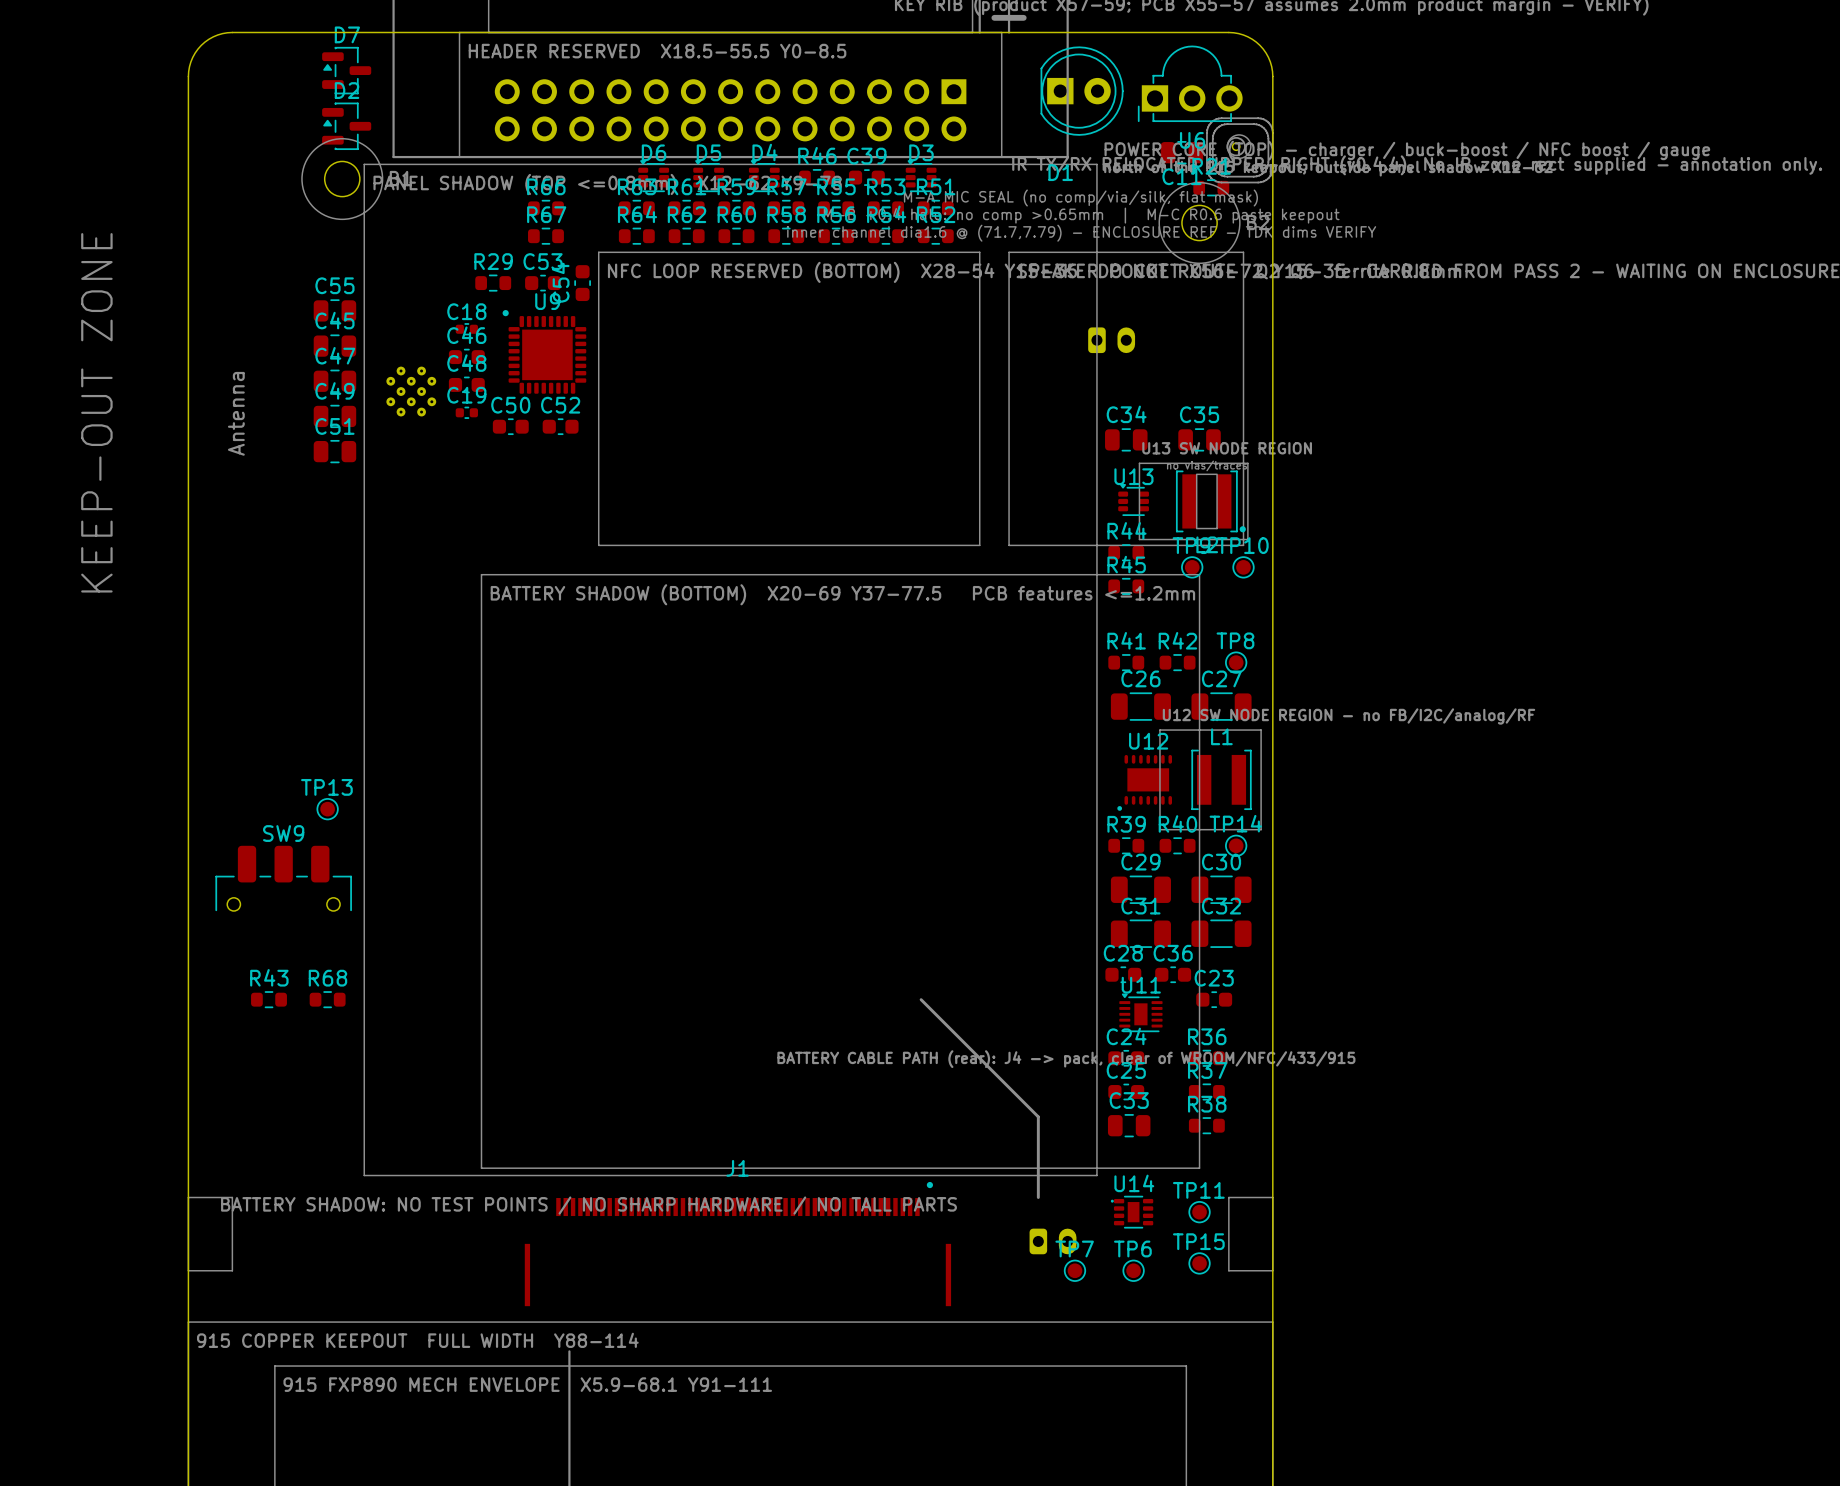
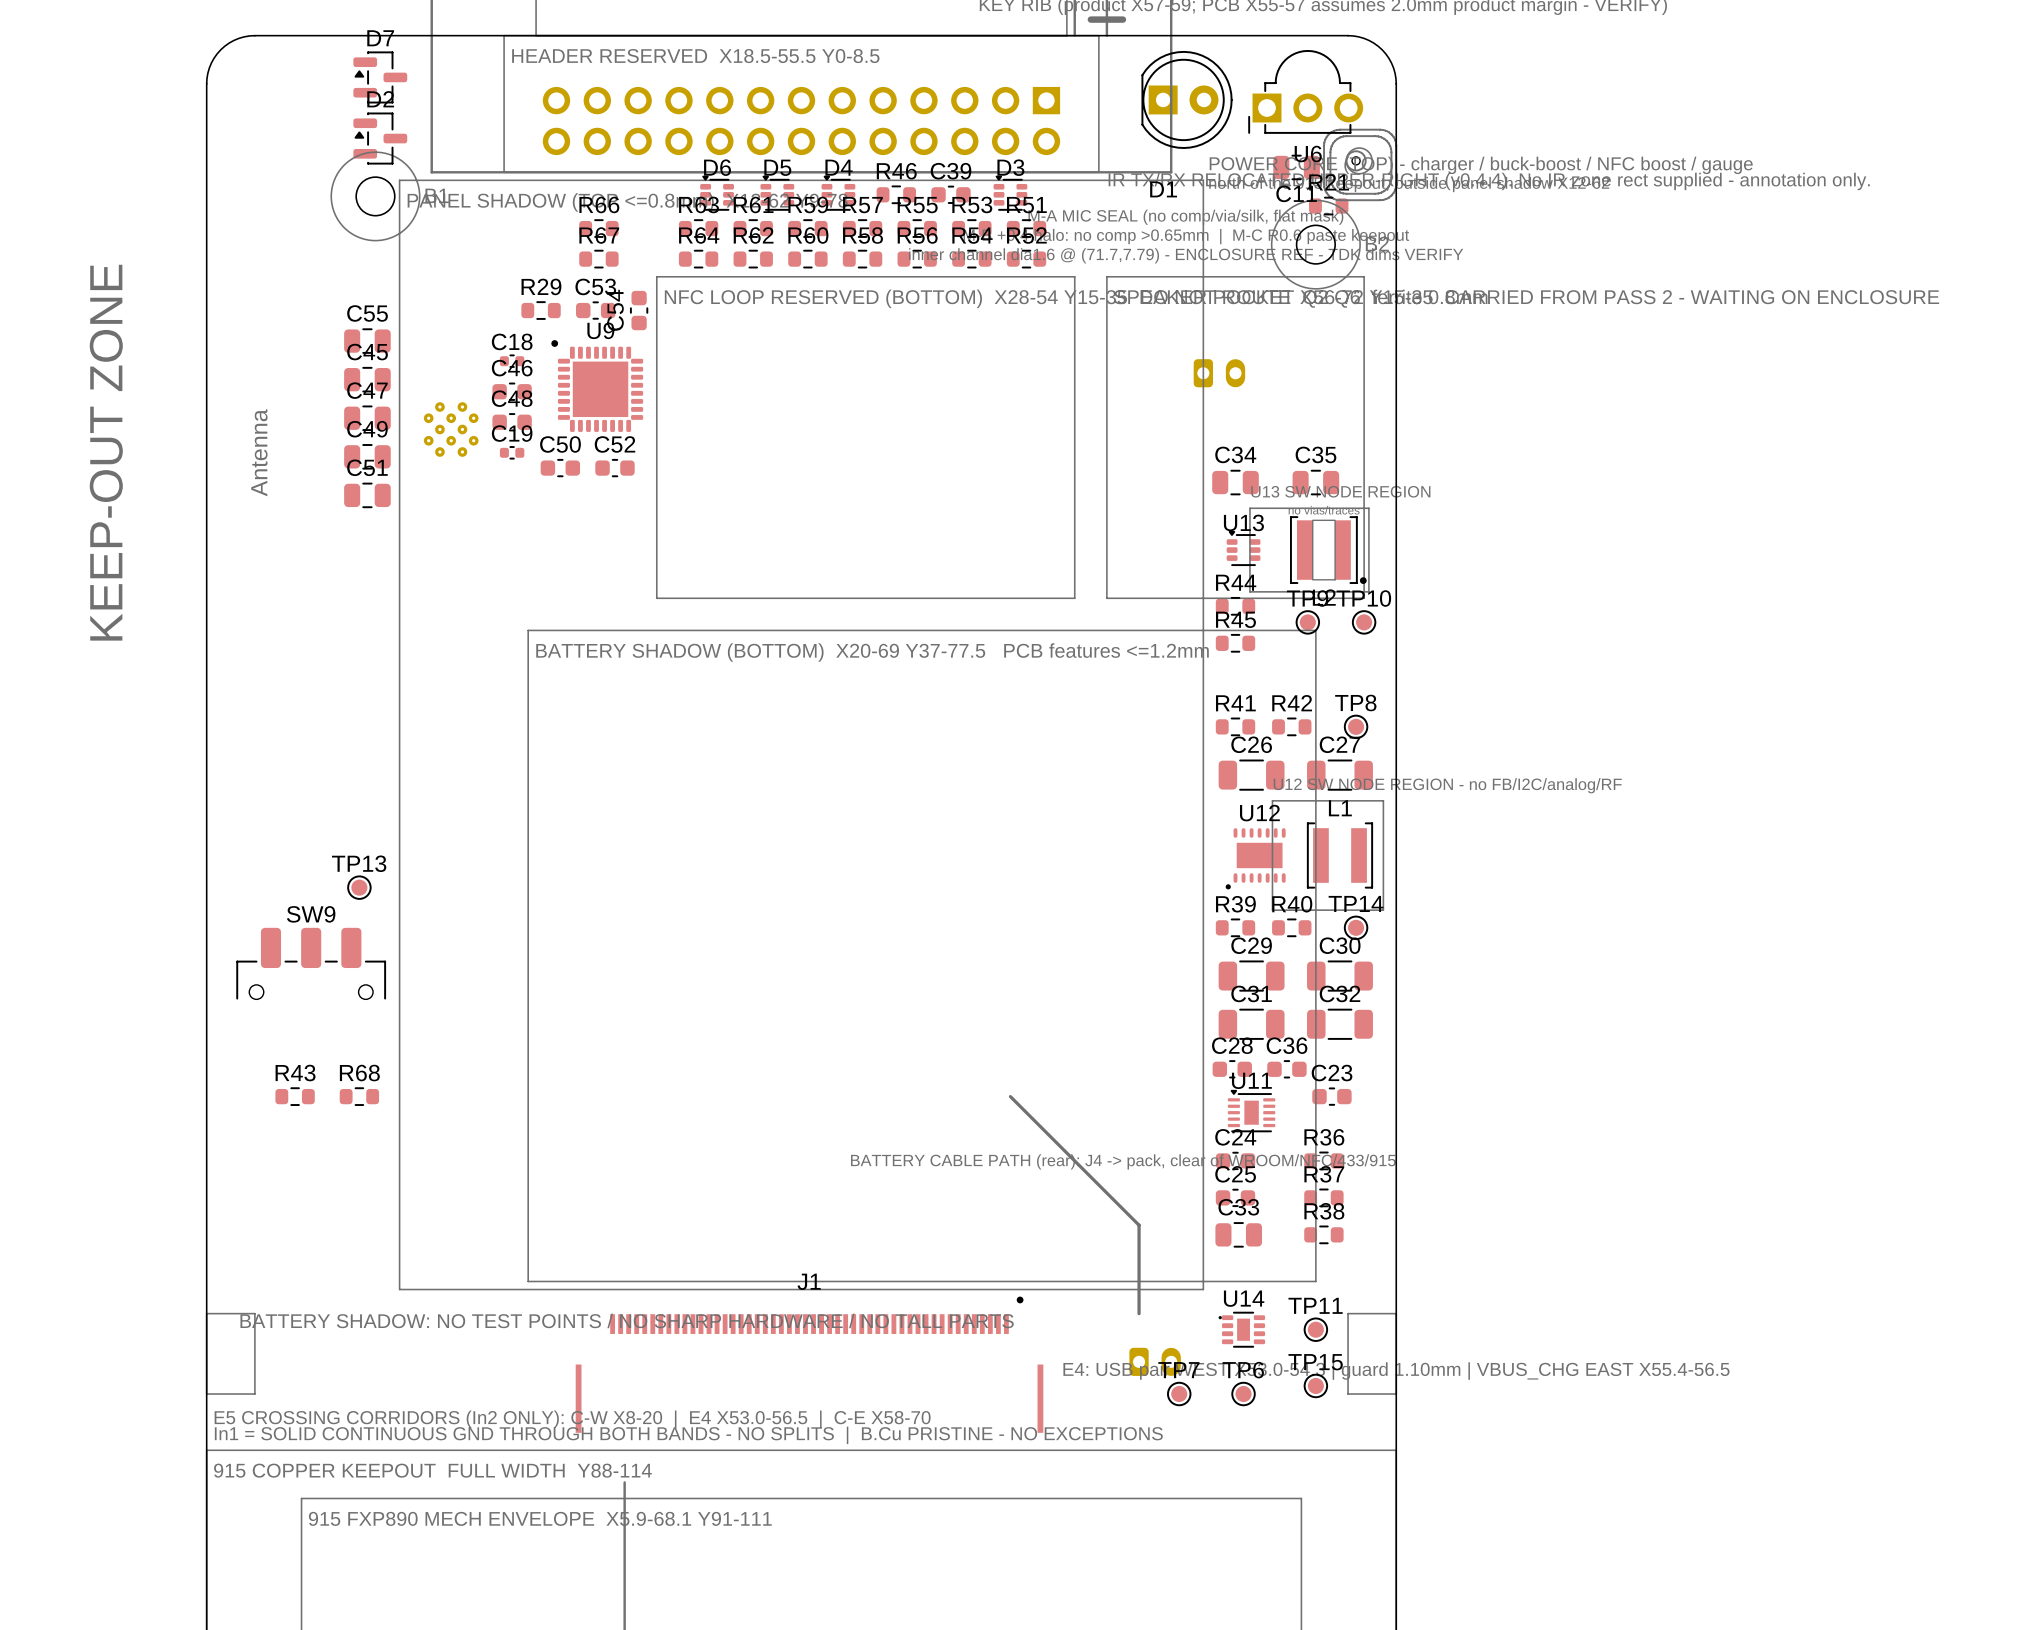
text: none -> E4: USB pair WEST X53.0-54.3 | guard 1.10mm | VBUS_CHG EAST X55.4-56.5 (1396, 1371)
text: none -> E5 CROSSING CORRIDORS (In2 ONLY): C-W X8-20 | E4 X53.0-56.5 | C-E X58-70 (572, 1419)
text: none -> In1 = SOLID CONTINUOUS GND THROUGH BOTH BANDS - NO SPLITS | B.Cu PRISTINE - NO EXCEPTIONS (688, 1435)

